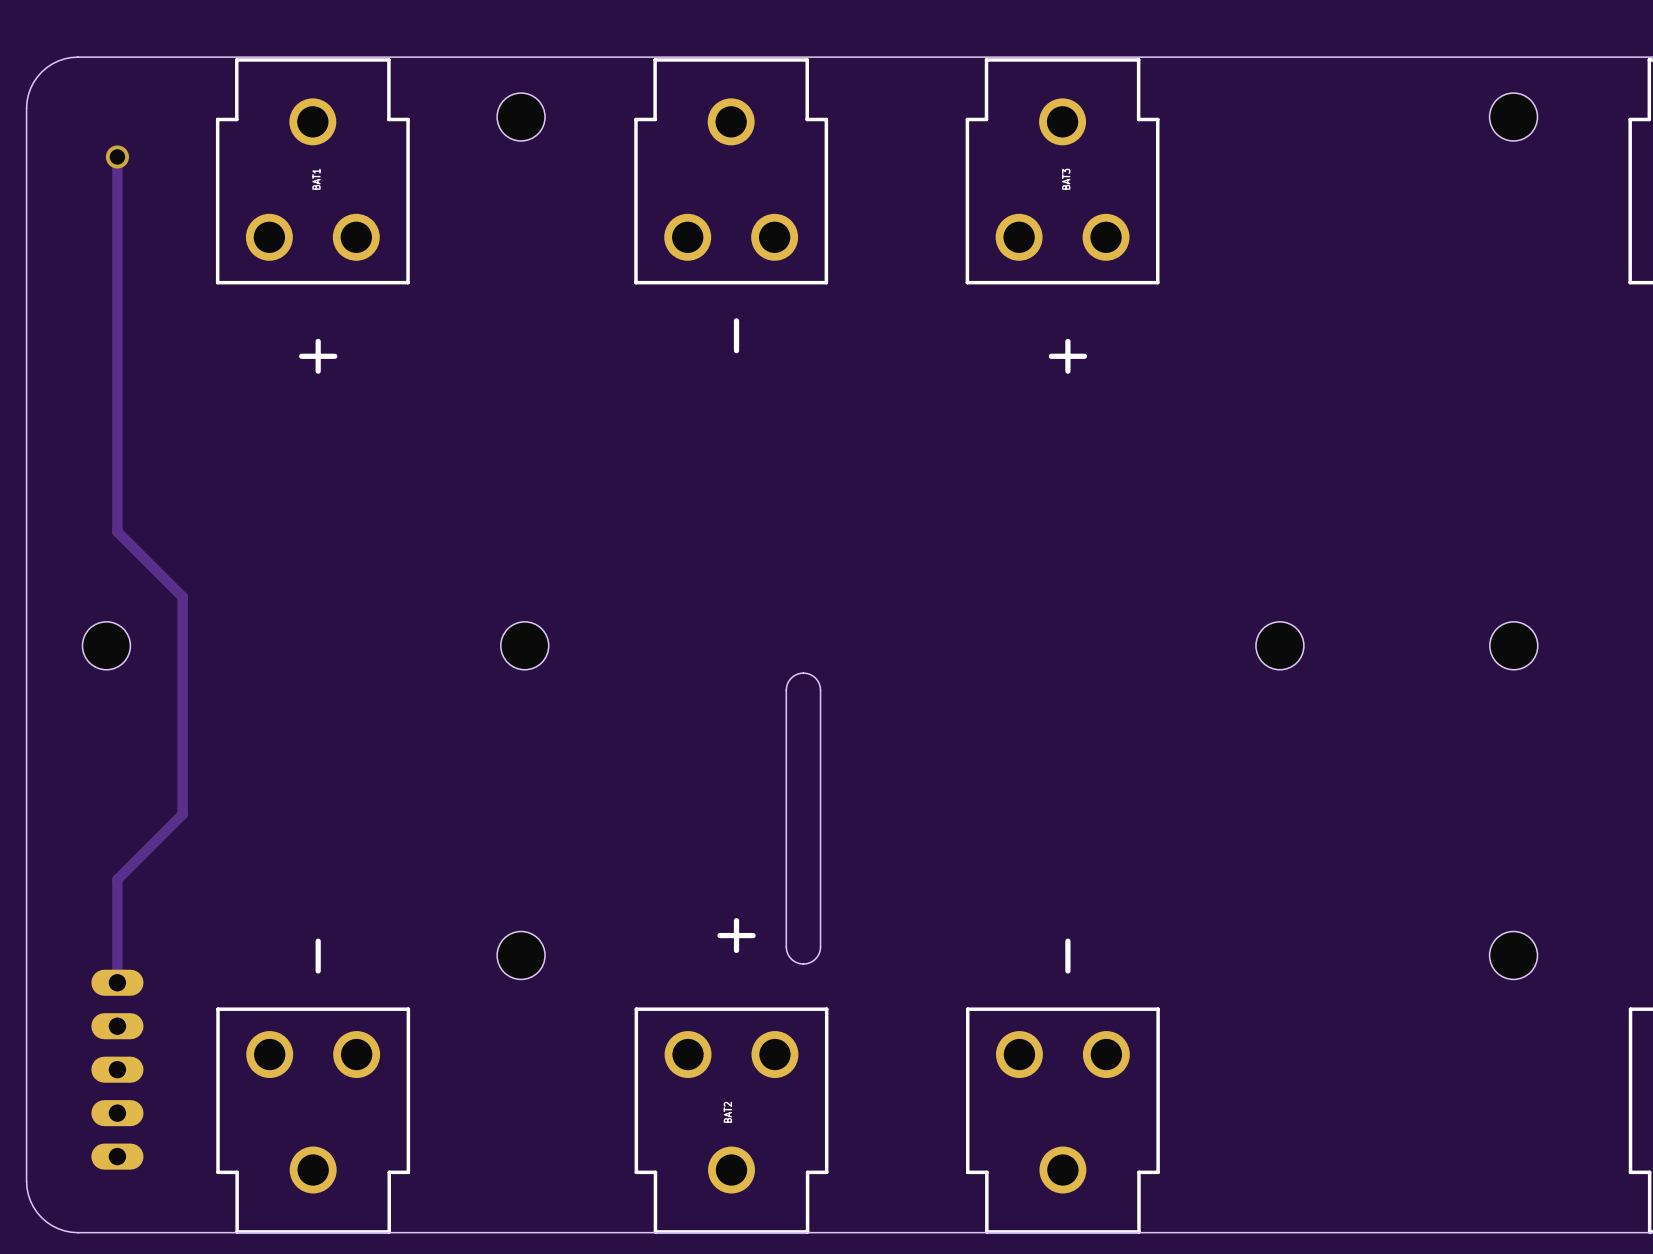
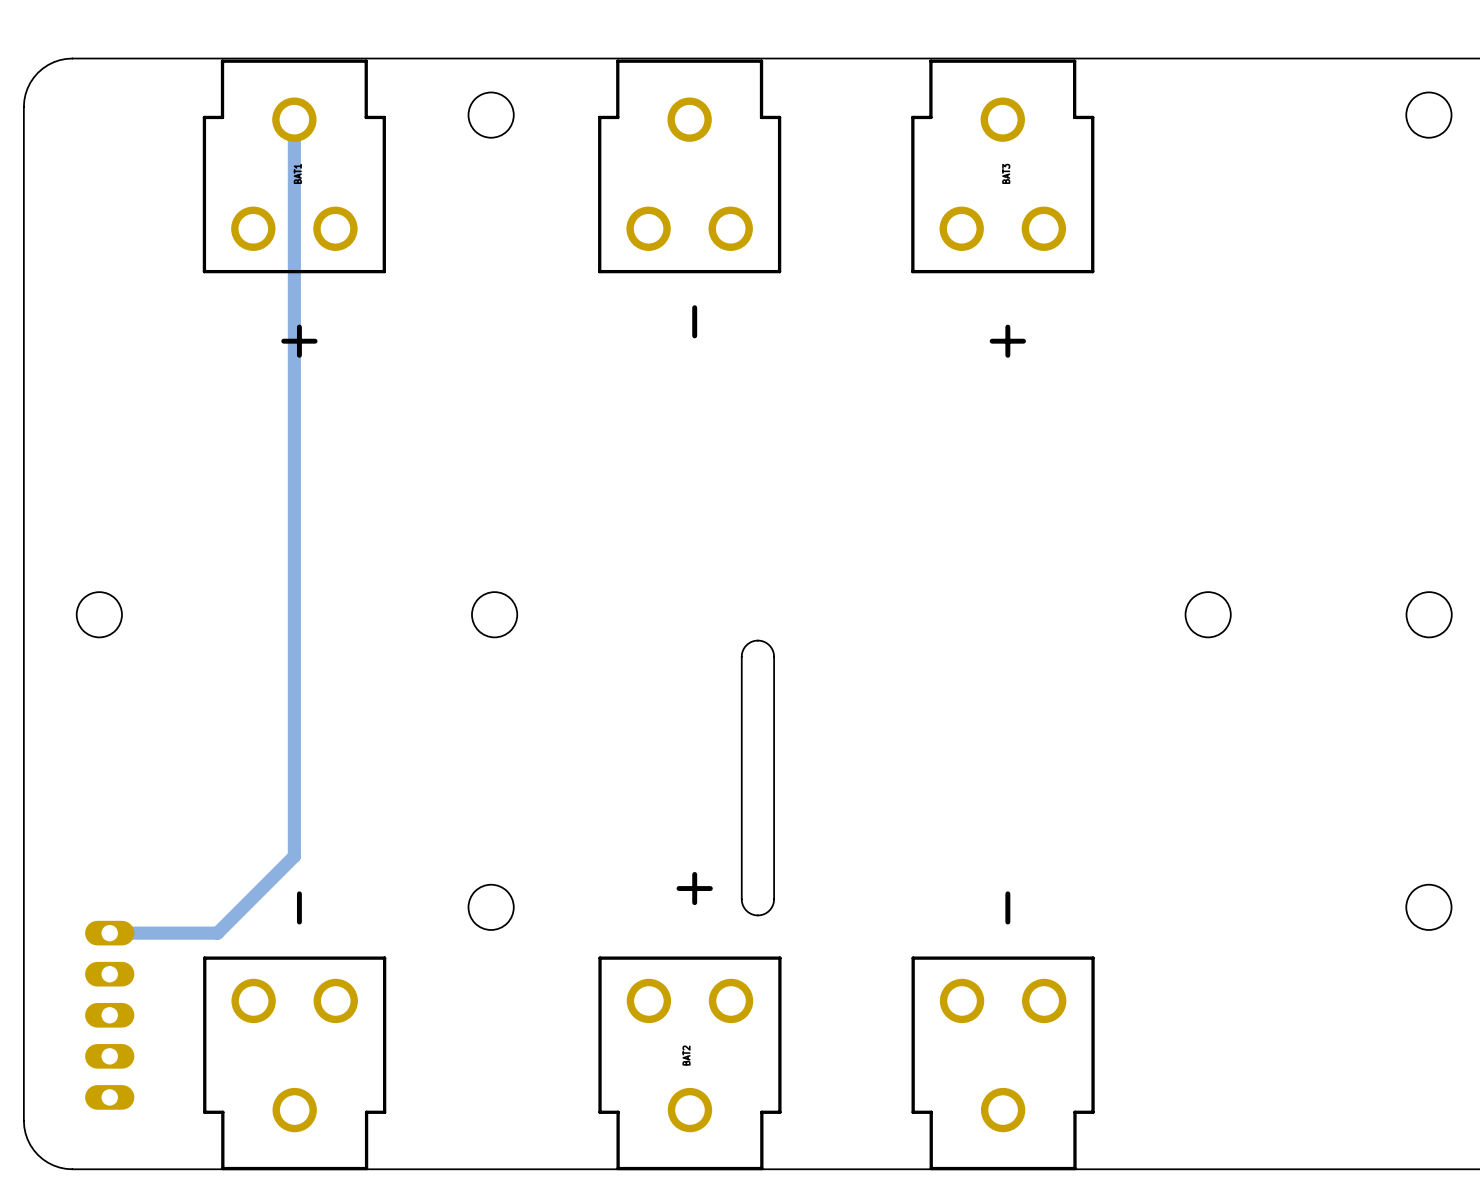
track: (117, 156) (117, 531) (182, 597) (182, 814) (117, 879) (117, 982) -> (294, 119) (294, 856) (217, 933) (109, 933)
via: (117, 156) -> none

